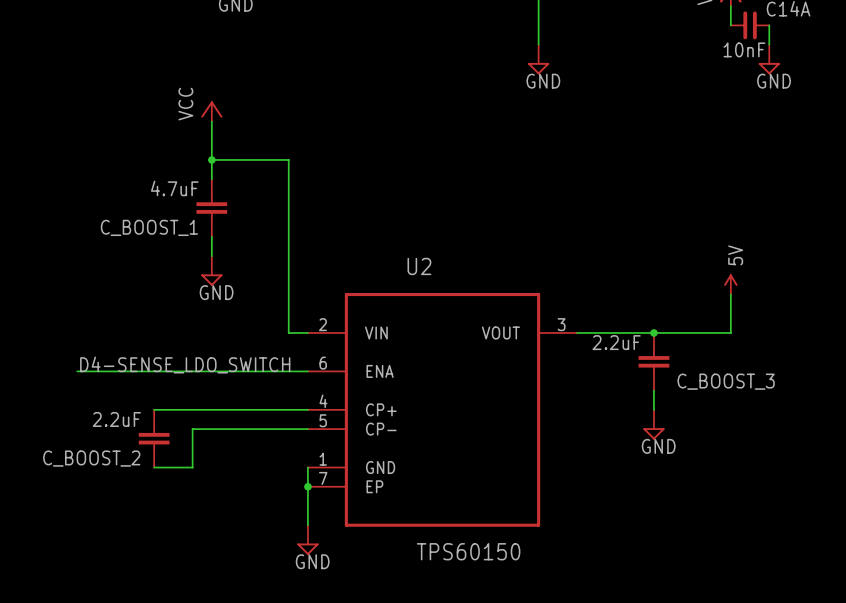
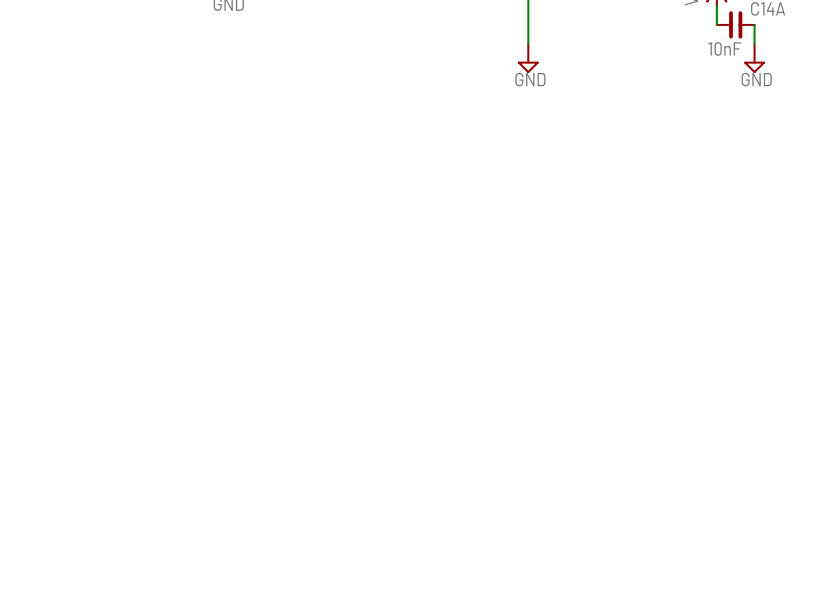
power symbol: VCC (211, 111) -> none
wire: (211, 121) (211, 179) -> none
wire: (211, 159) (288, 159) (288, 332) (307, 332) -> none
junction: (211, 159) -> none
C_BOOST_1: 4.7uF (211, 208) -> none
wire: (211, 236) (211, 256) -> none
power symbol: GND (211, 270) -> none
power symbol: 5V (730, 284) -> none
wire: (730, 294) (730, 332) (577, 332) -> none
junction: (653, 332) -> none
C_BOOST_3: 2.2uF (653, 361) -> none
label: D4-SENSE_LDO_SWITCH (185, 365) -> none
wire: (77, 371) (307, 371) -> none
wire: (653, 390) (653, 409) -> none
wire: (154, 409) (307, 409) -> none
U2: TPS60150 (442, 409) -> none
power symbol: GND (653, 424) -> none
wire: (307, 429) (192, 429) (192, 467) (154, 467) -> none
C_BOOST_2: 2.2uF (154, 438) -> none
wire: (307, 467) (307, 525) -> none
junction: (307, 486) -> none
power symbol: GND (307, 540) -> none

